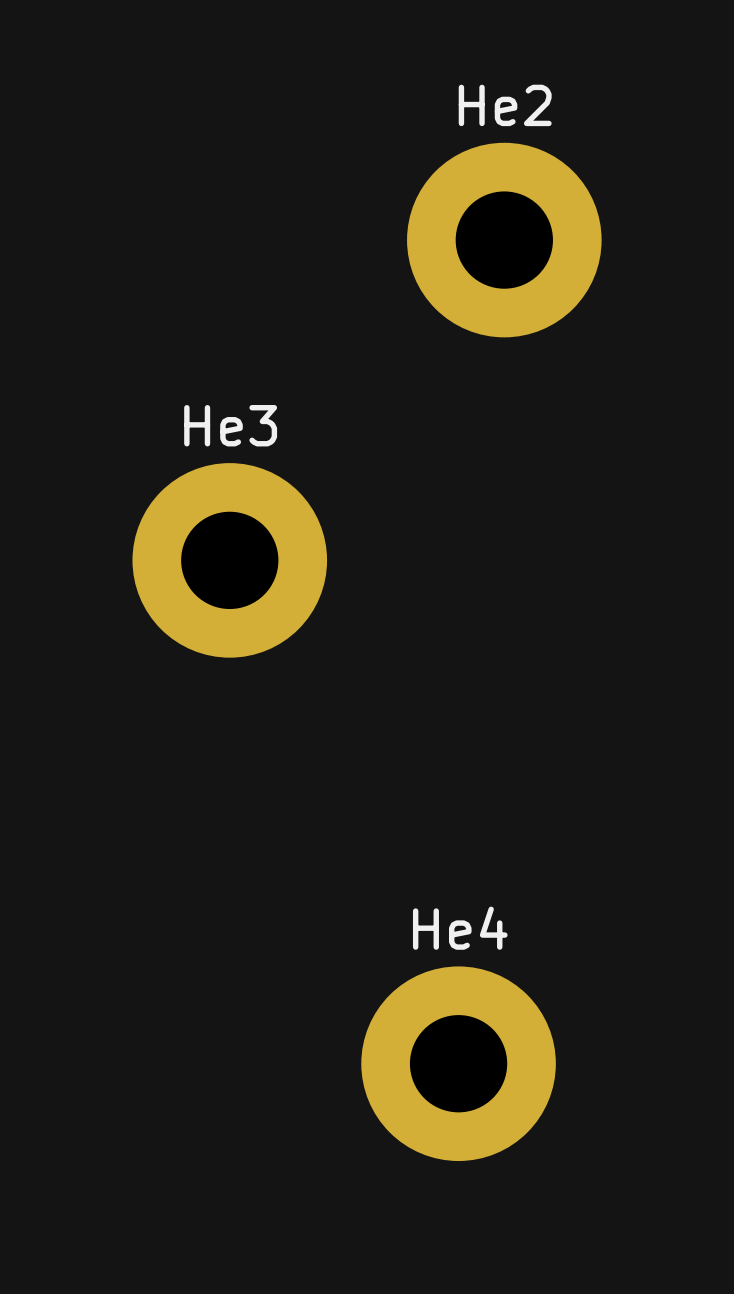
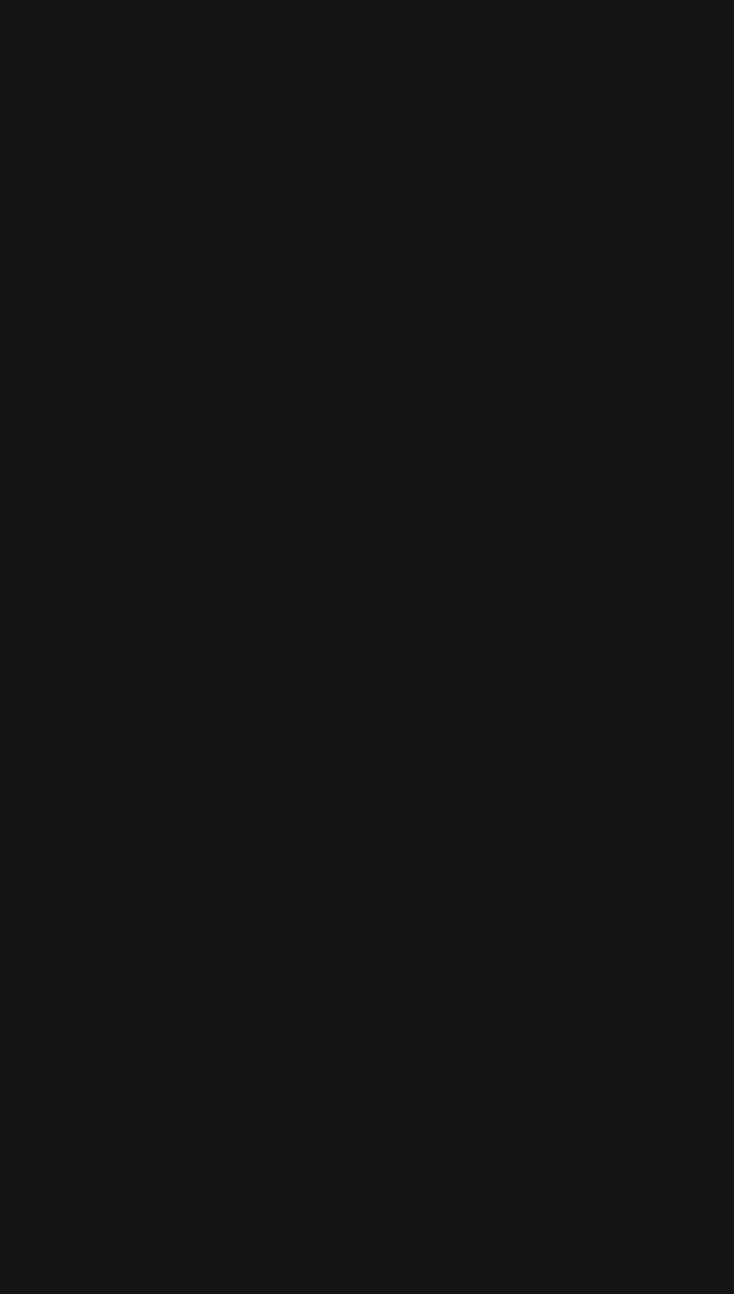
He2: (504, 240) -> none
He3: (229, 560) -> none
He4: (458, 1063) -> none

